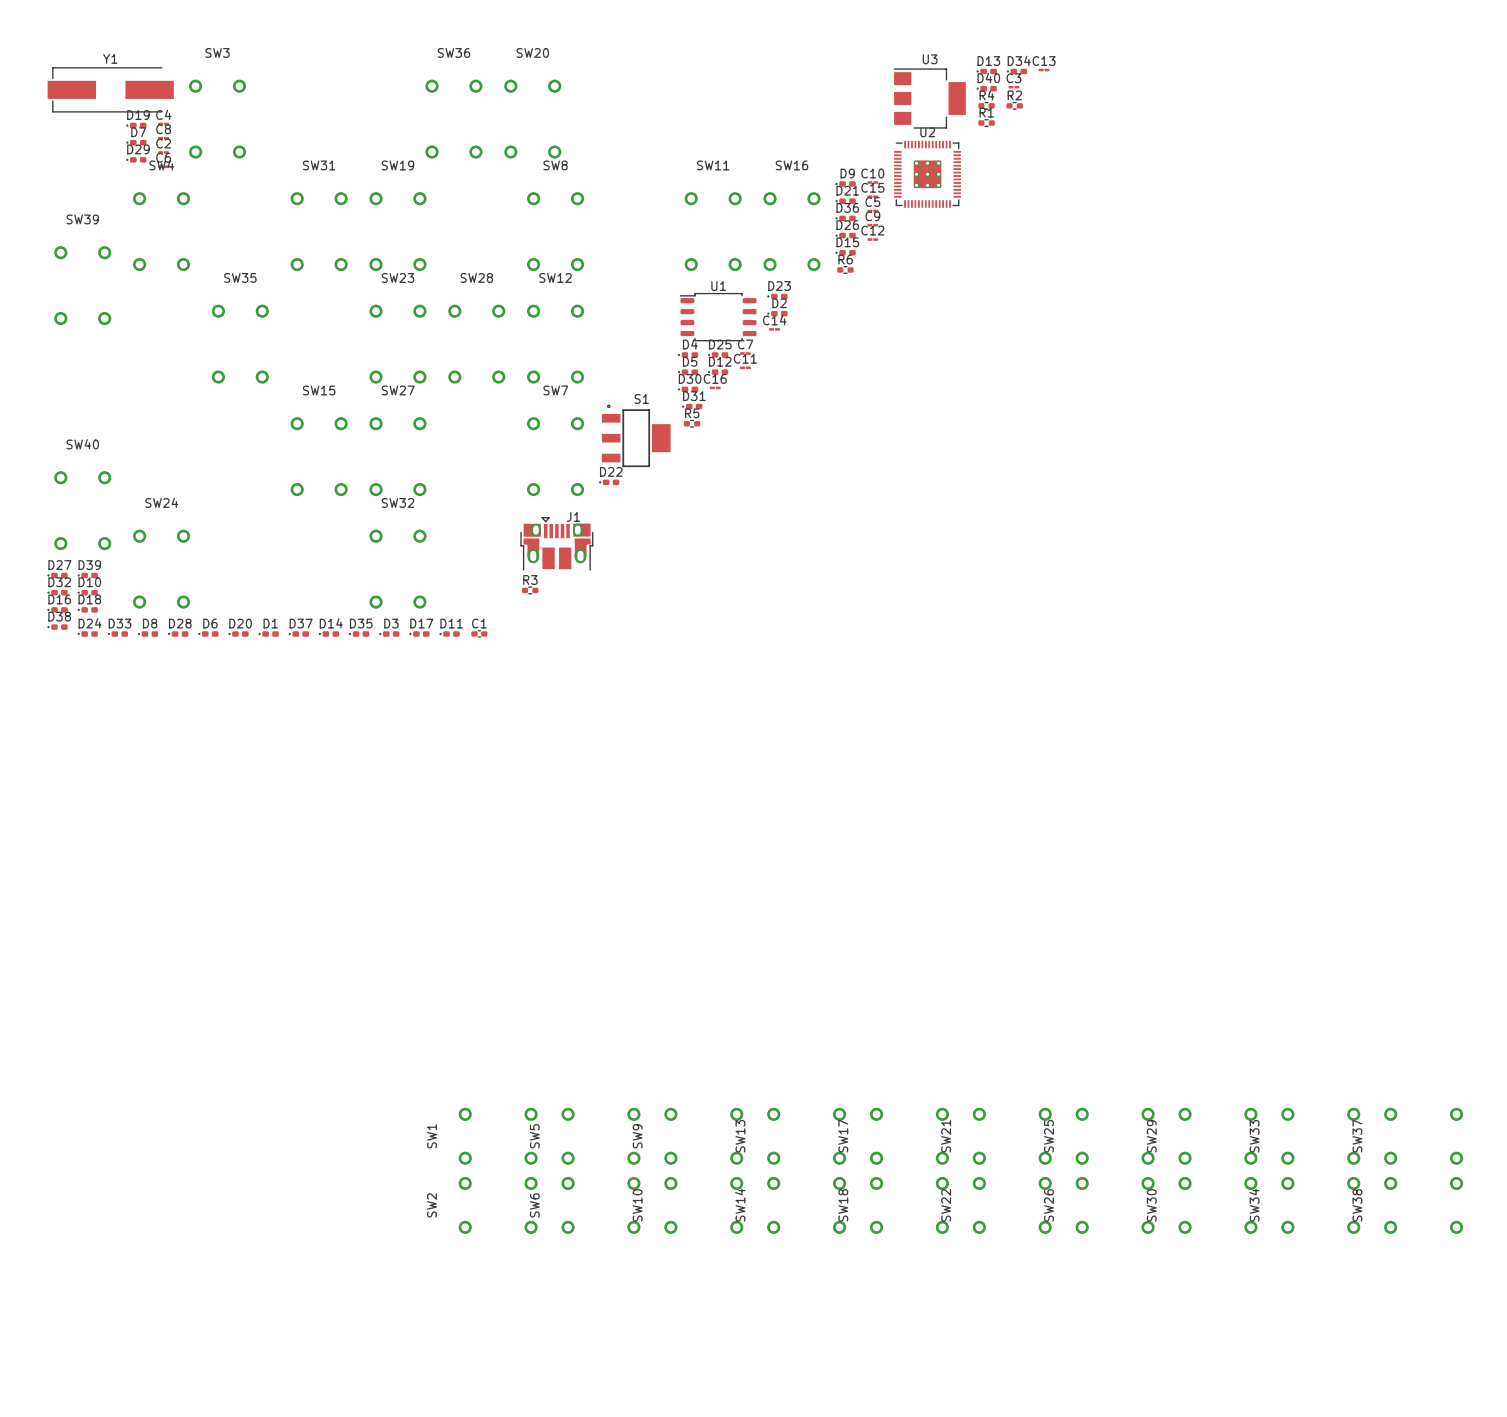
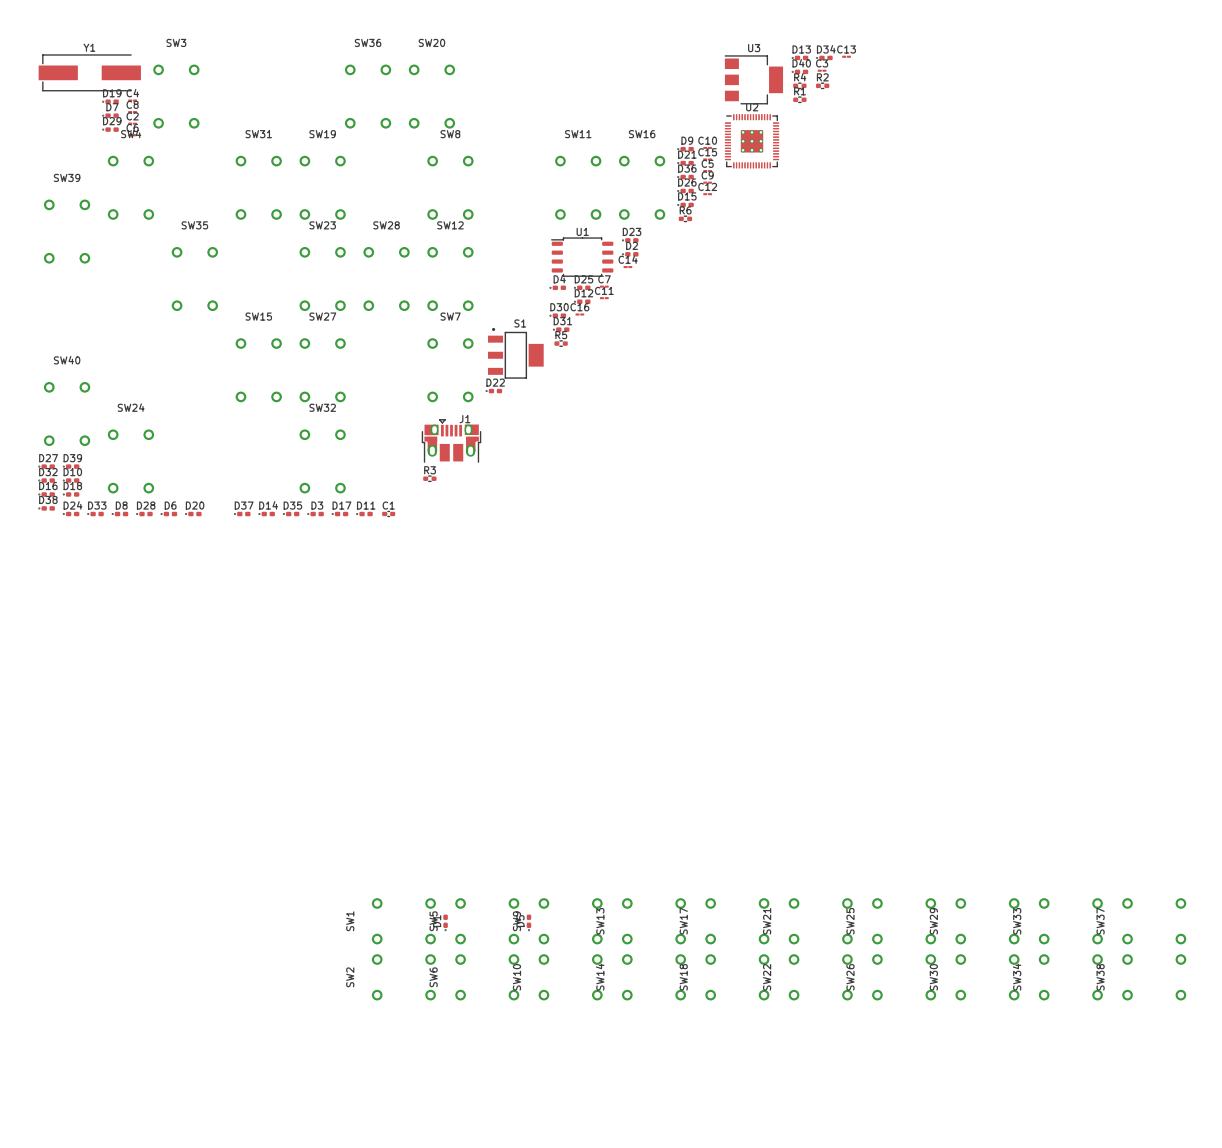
D5 rotation: 0° (688, 372) -> 90° counterclockwise (528, 922)
D5 position: (688, 372) -> (528, 922)
D1 rotation: 0° (268, 633) -> 90° counterclockwise (445, 922)
D1 position: (268, 633) -> (445, 922)

